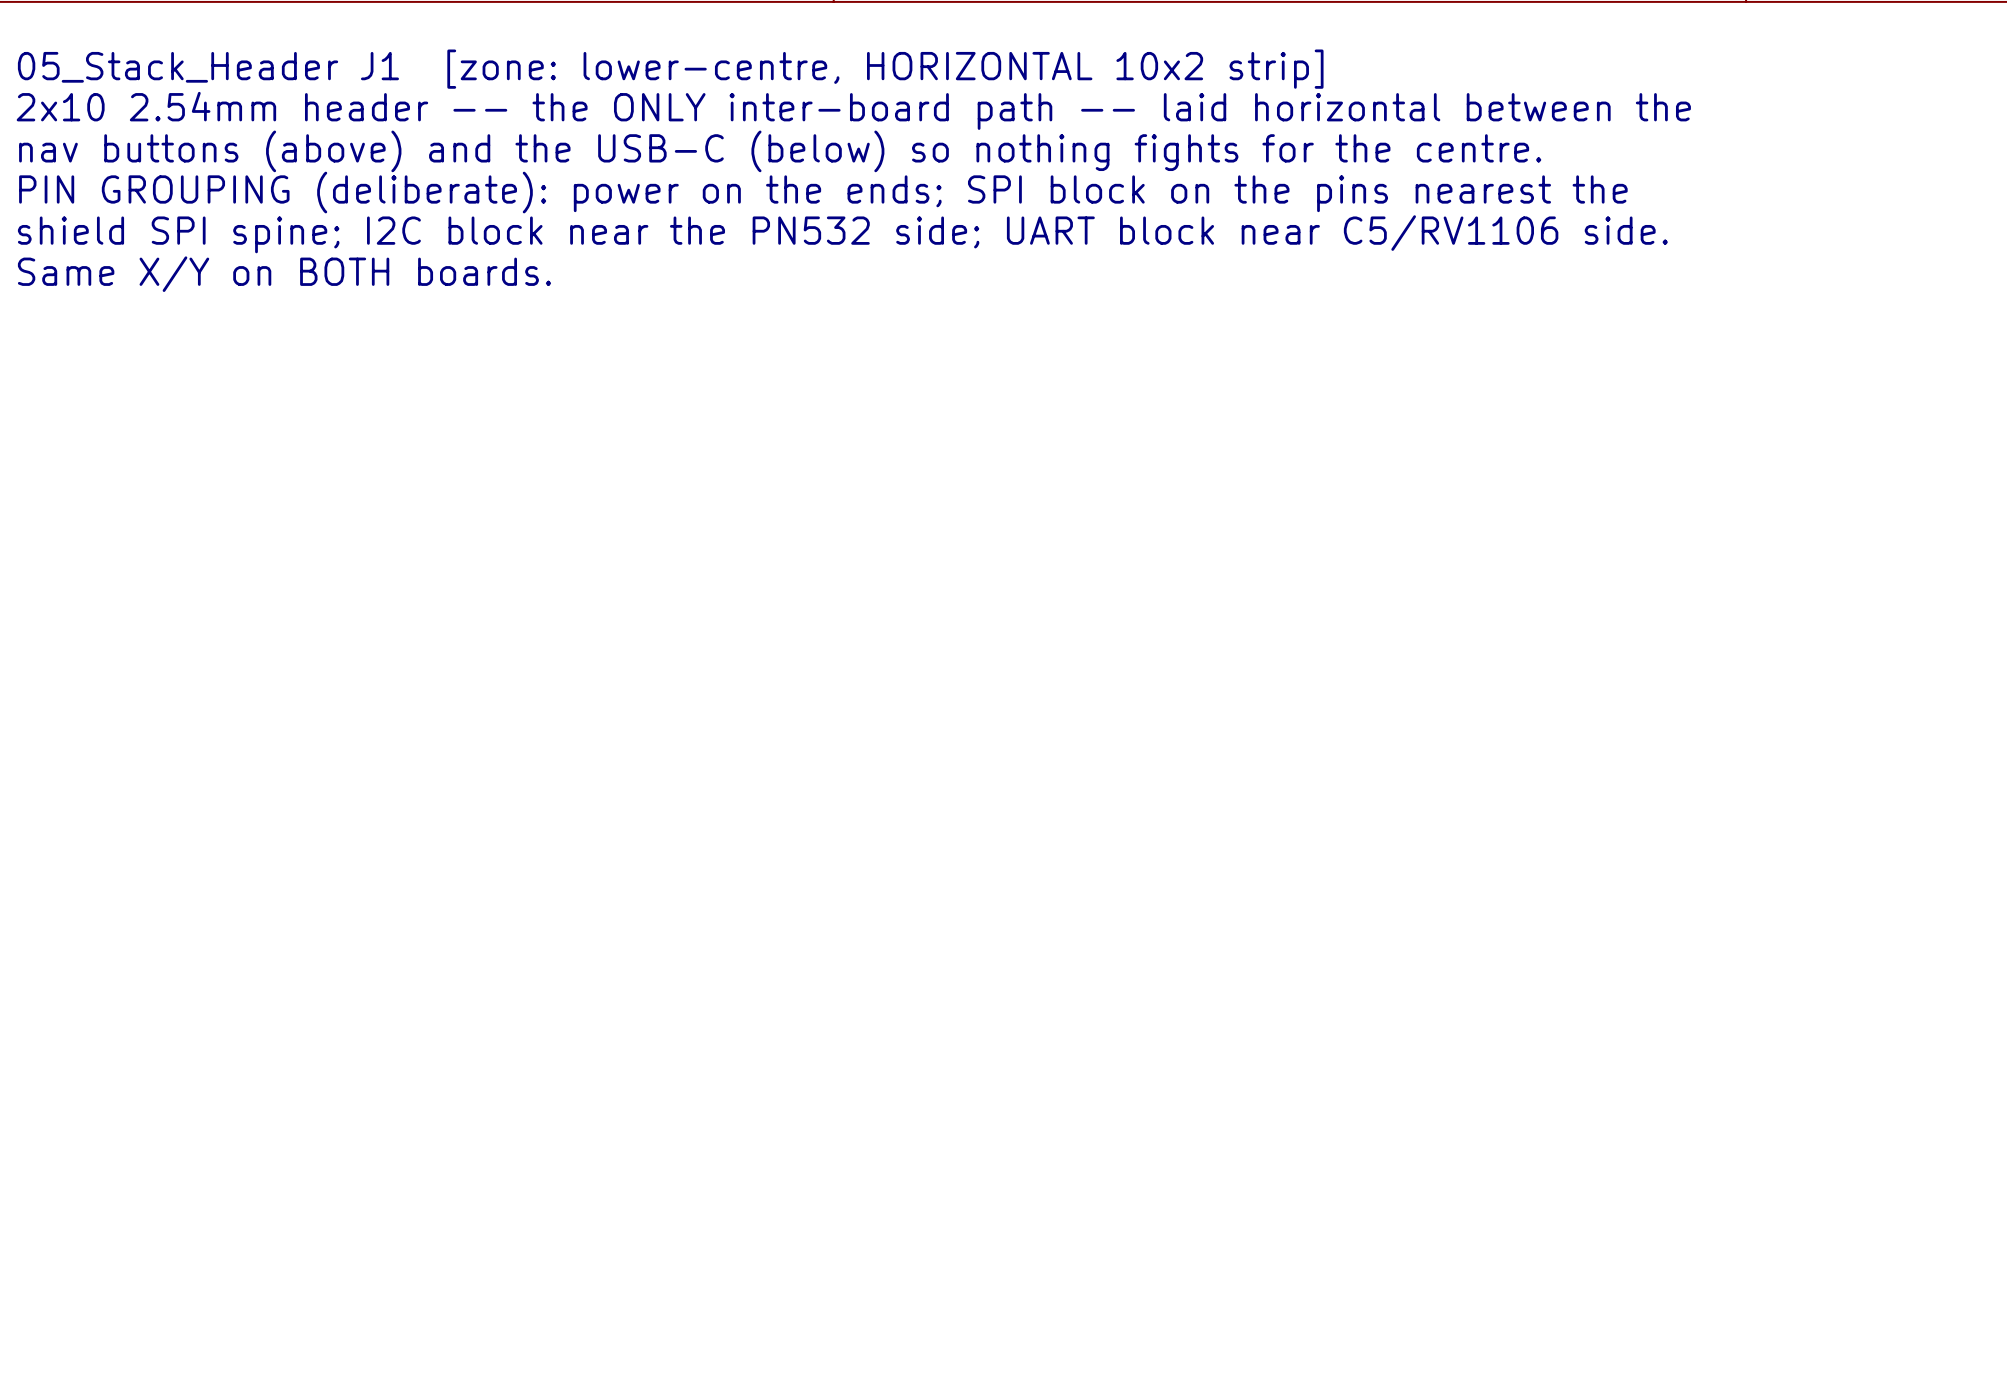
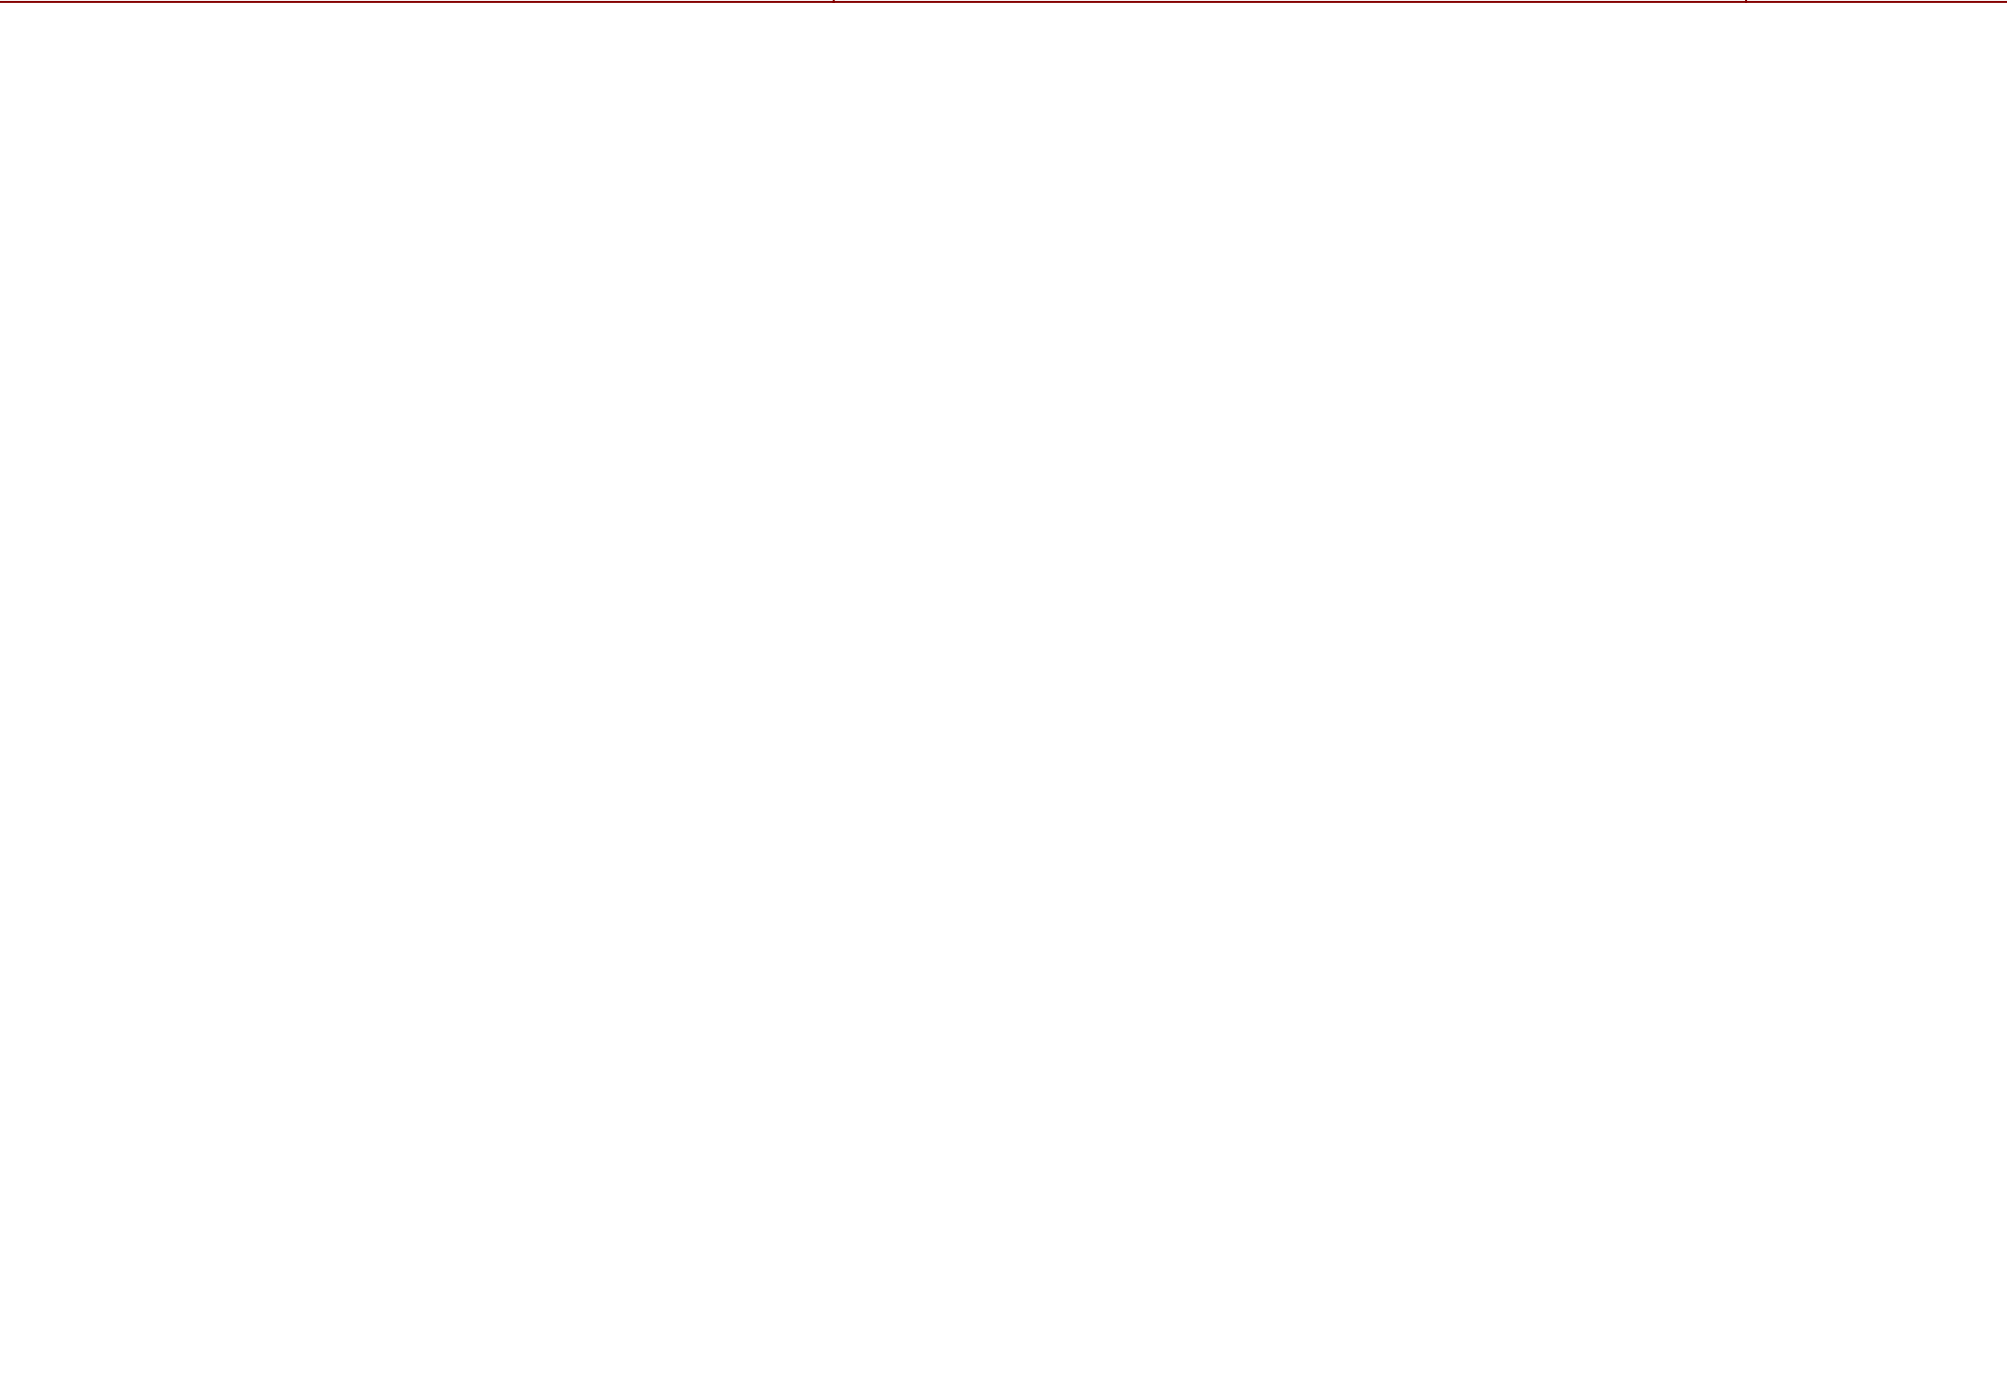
text: 05_Stack_Header J1 [zone: lower-centre, HORIZONTAL 10x2 strip] (670, 69) -> none
text: 2x10 2.54mm header -- the ONLY inter-board path -- laid horizontal between the (853, 110) -> none
text: nav buttons (above) and the USB-C (below) so nothing fights for the centre. (780, 151) -> none
text: PIN GROUPING (deliberate): power on the ends; SPI block on the pins nearest the (823, 192) -> none
text: shield SPI spine; I2C block near the PN532 side; UART block near C5/RV1106 side. (842, 234) -> none
text: Same X/Y on BOTH boards. (284, 274) -> none

